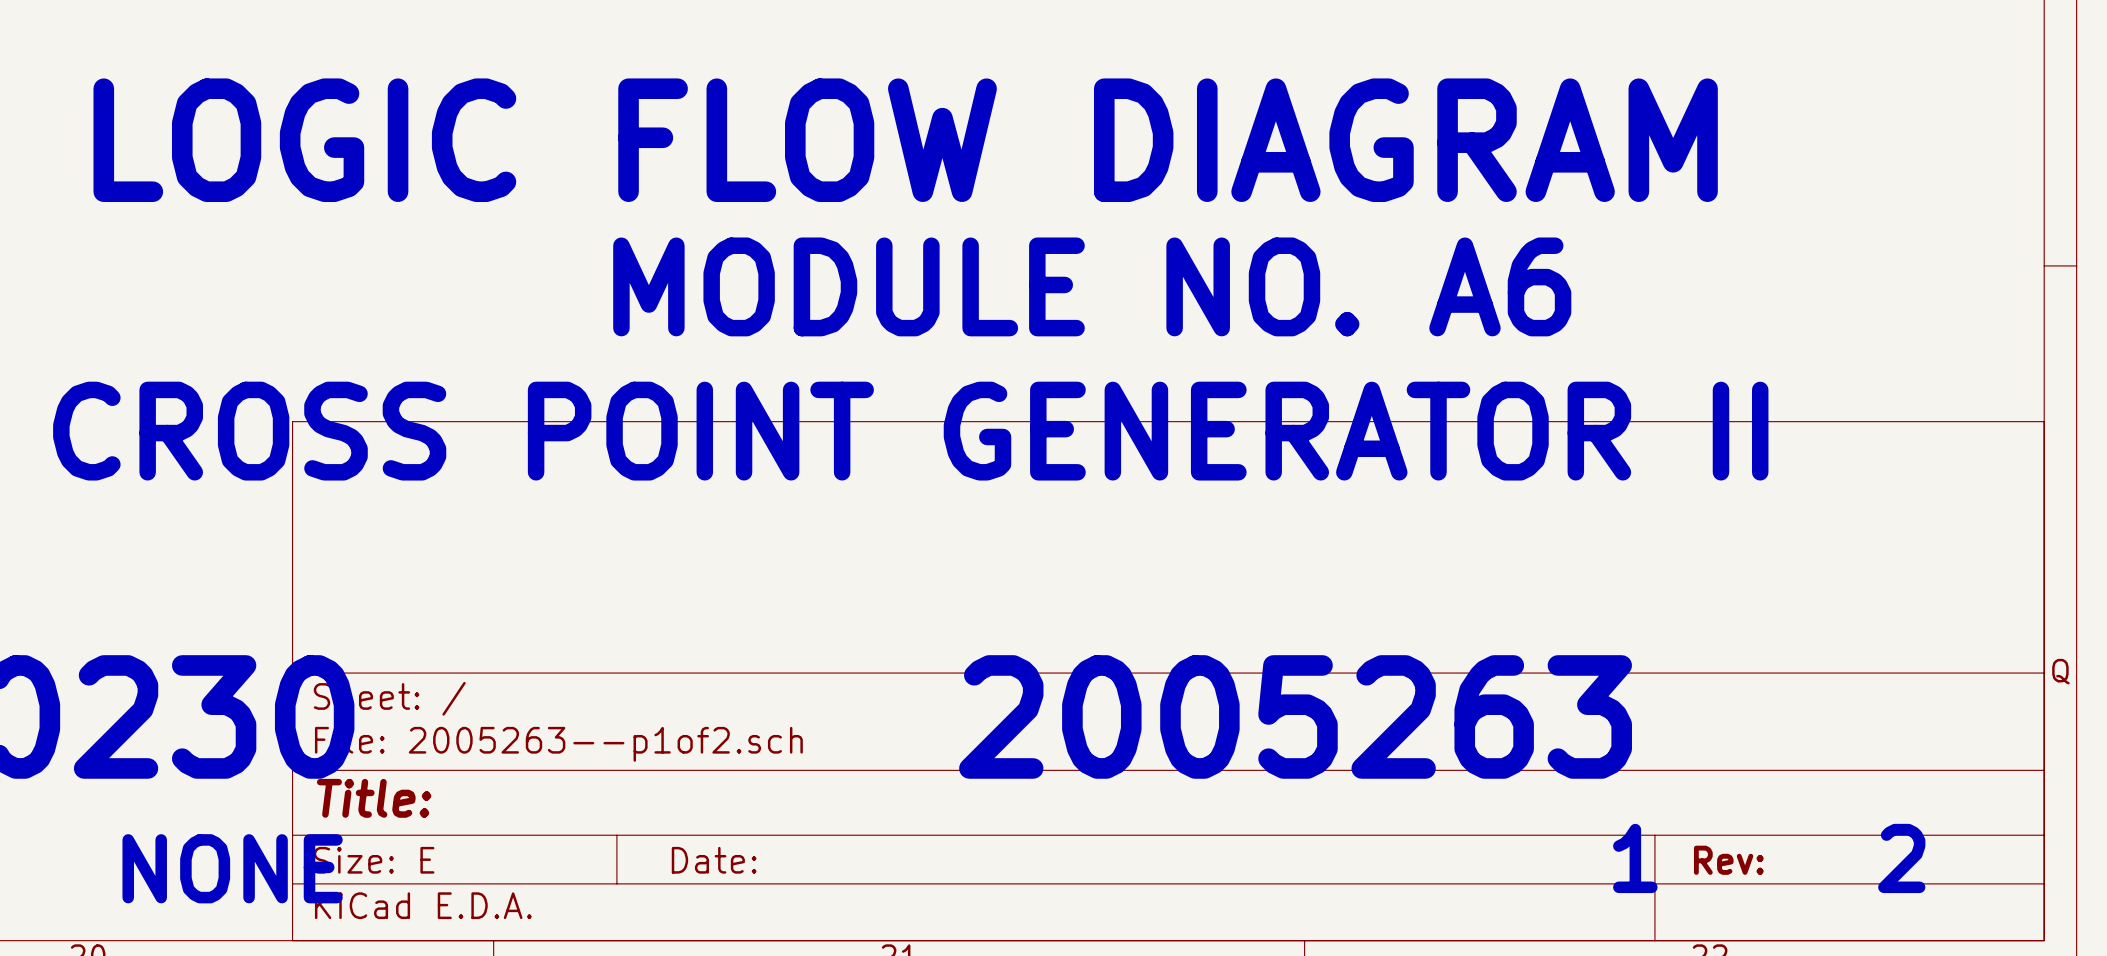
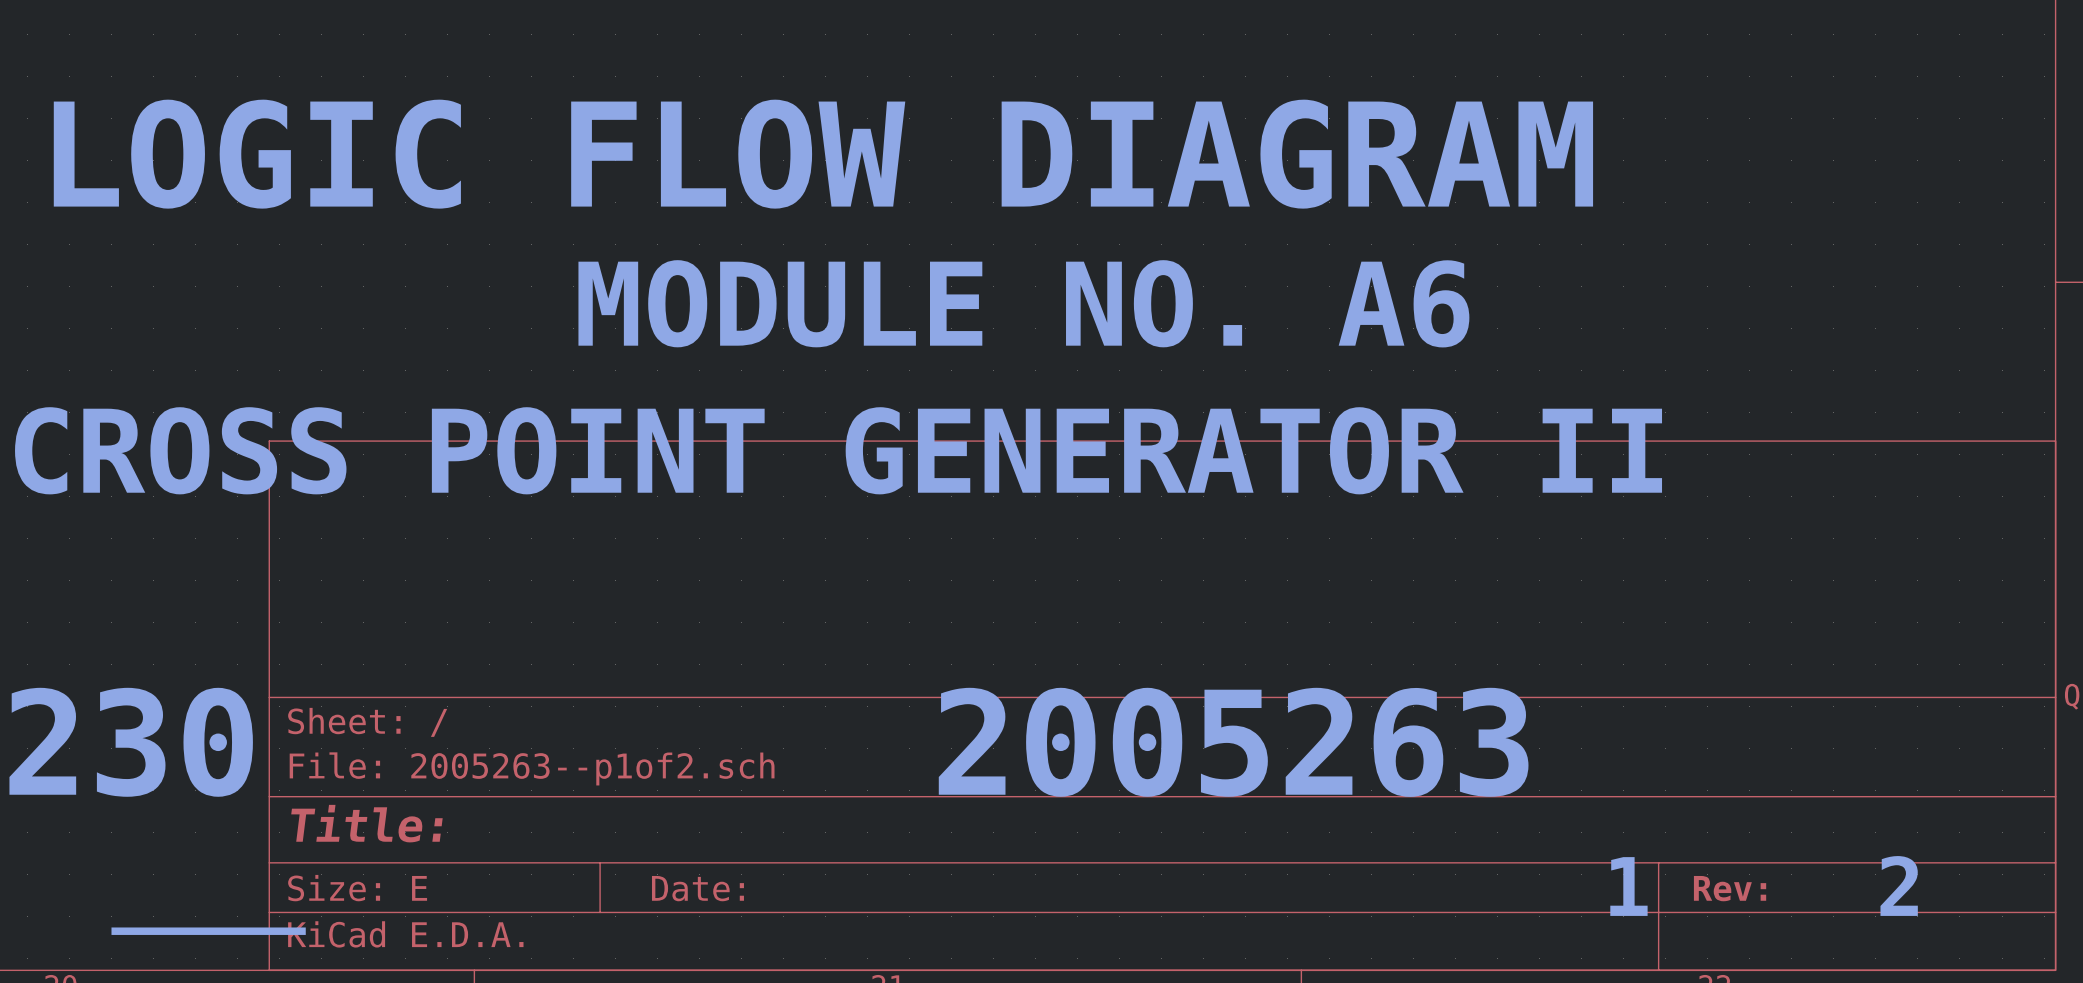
text: NONE (232, 868) -> none
text: none -> ____ (208, 931)

